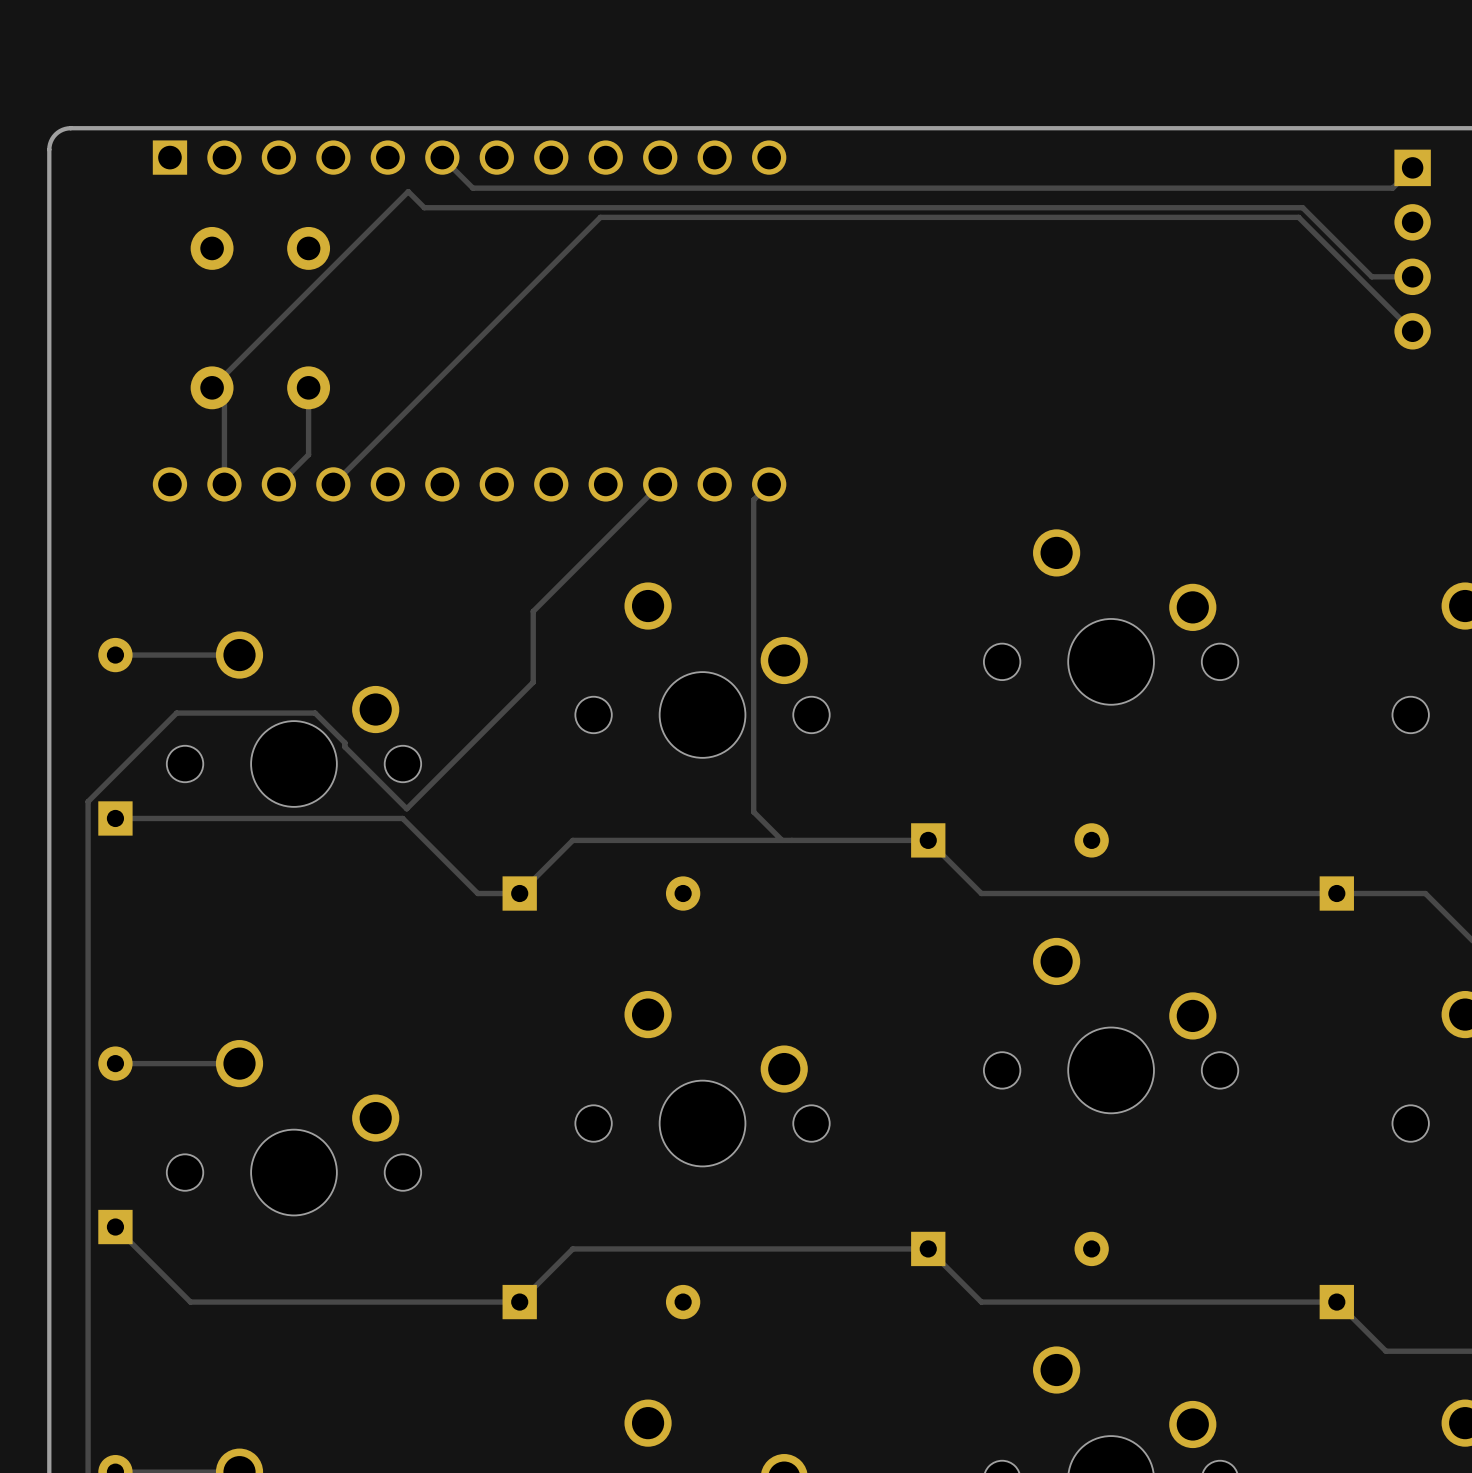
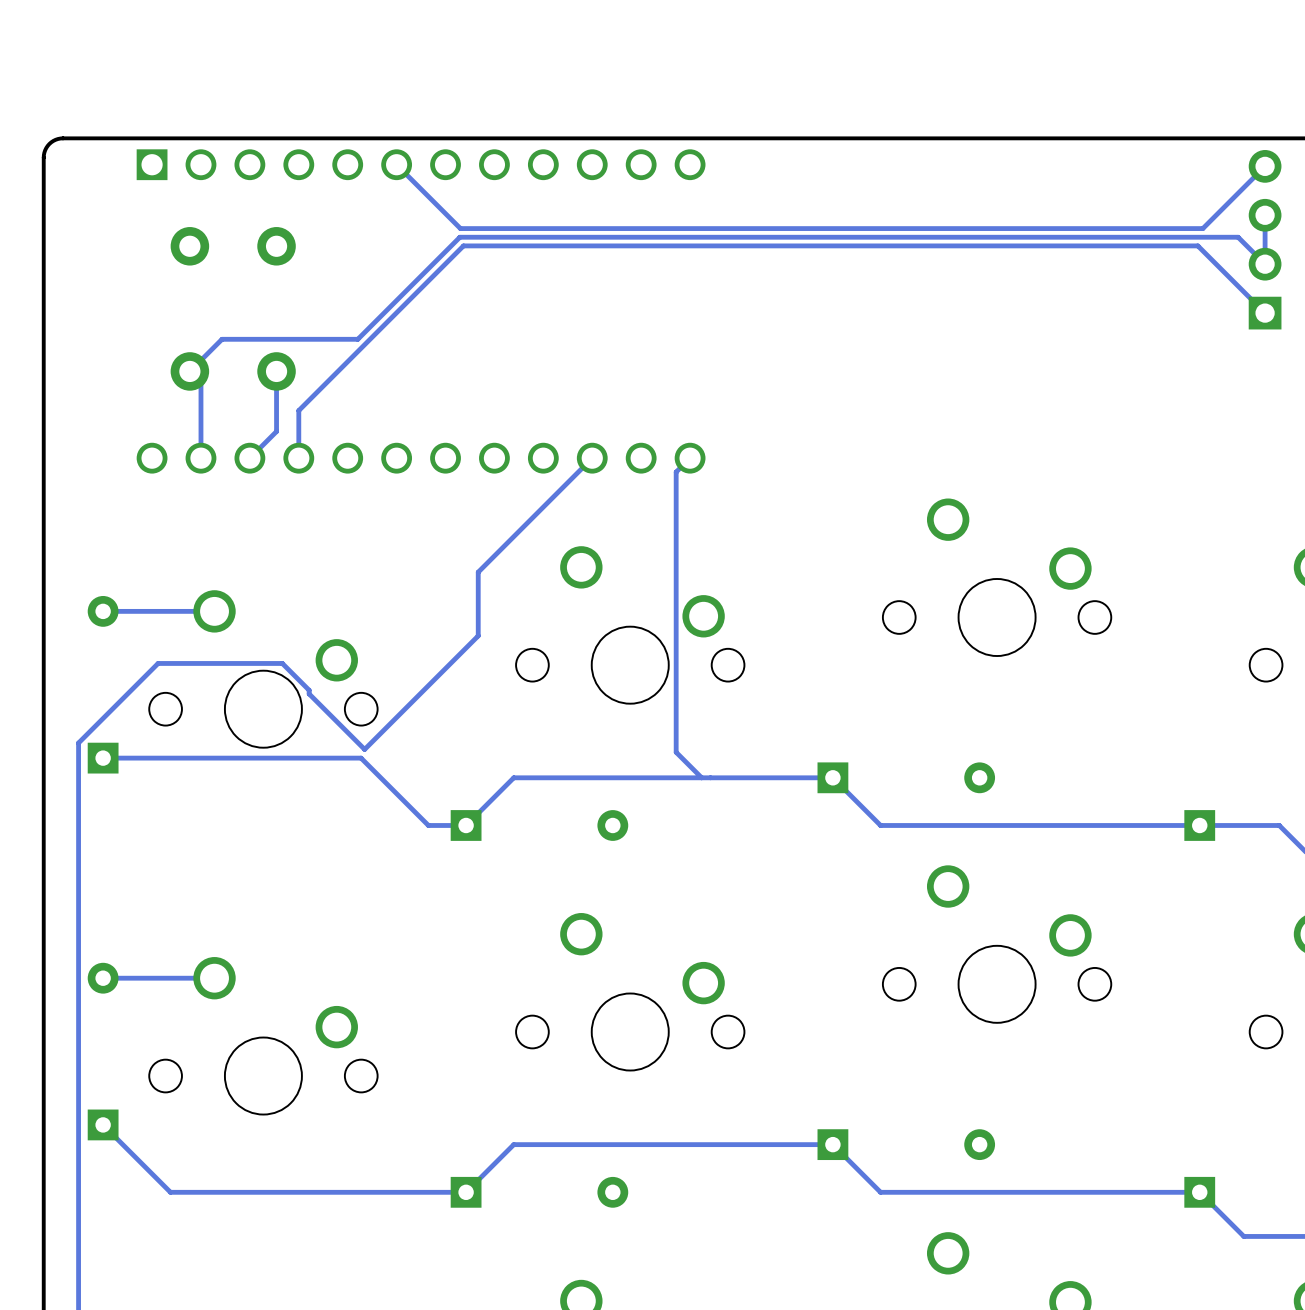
track: (1412, 168) (1392, 188) (472, 188) -> (1265, 166) (1202, 228) (460, 228) (424, 192)
part rotation: 0° (1412, 249) -> 180° (1265, 239)
track: (1412, 276) (1371, 276) (1302, 207) (424, 207) (408, 191) (247, 352) -> (1265, 215) (1265, 264) (1238, 237) (459, 237) (357, 339) (222, 339)
track: (1412, 331) (1298, 217) (600, 217) (333, 484) -> (1265, 313) (1197, 245) (463, 245) (298, 410) (298, 458)

